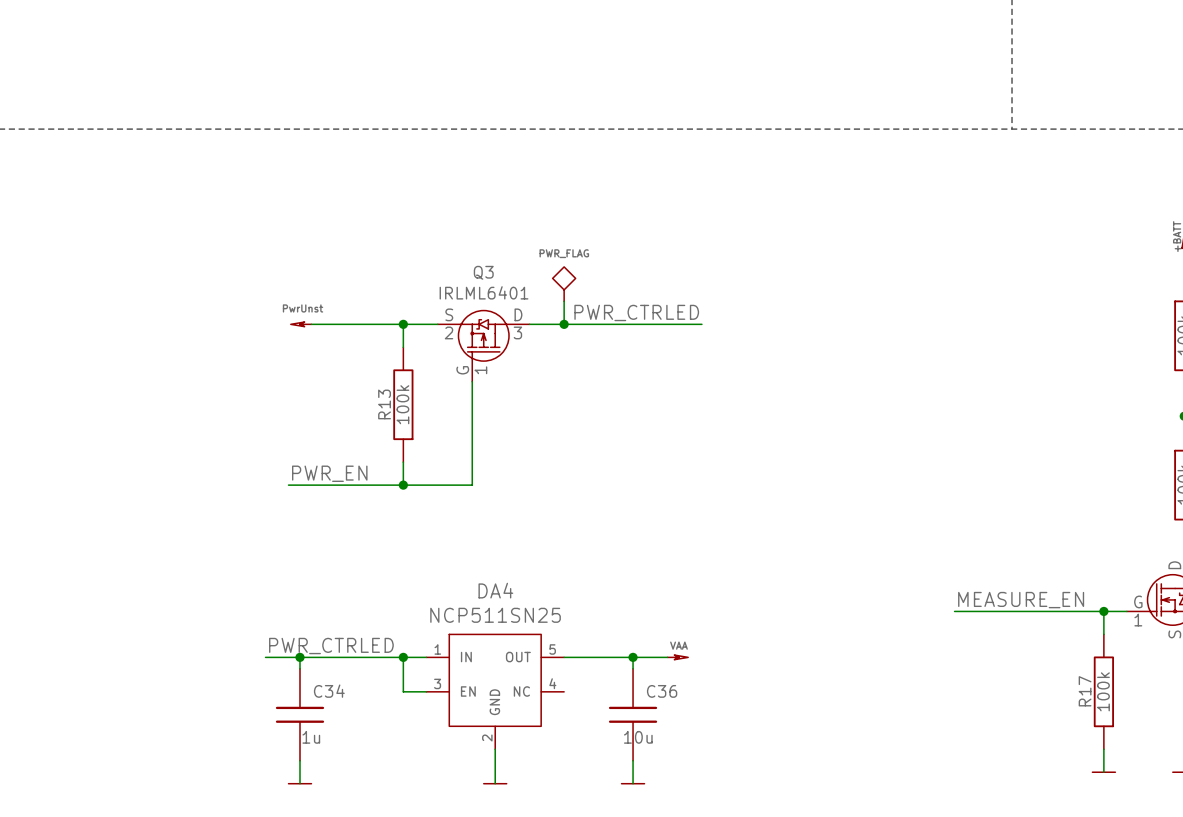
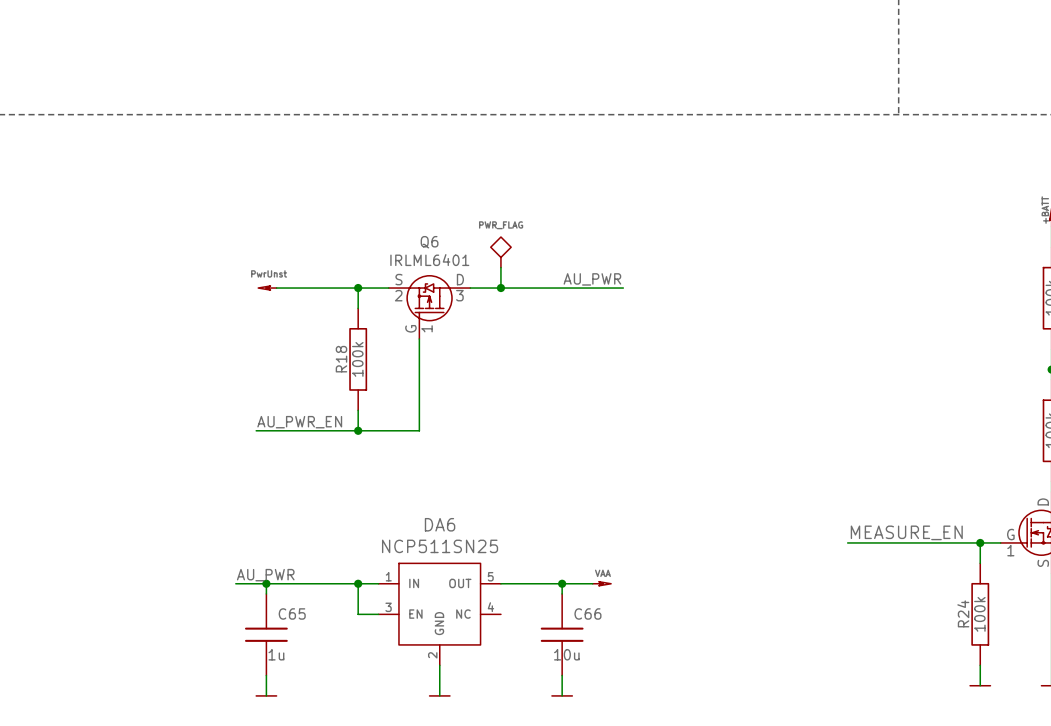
Q3 name: Q3 (483, 272) -> Q6 (429, 242)
label: PWR_CTRLED (636, 312) -> AU_PWR (592, 279)
R13 name: R13 (384, 404) -> R18 (341, 359)
label: PWR_EN (329, 473) -> AU_PWR_EN (299, 422)
DA4 name: DA4 (495, 590) -> DA6 (440, 524)
label: PWR_CTRLED (331, 646) -> AU_PWR (265, 575)
C34 name: C34 (329, 691) -> C65 (292, 613)
C36 name: C36 (662, 691) -> C66 (587, 613)
R17 name: R17 (1085, 691) -> R24 (963, 613)

